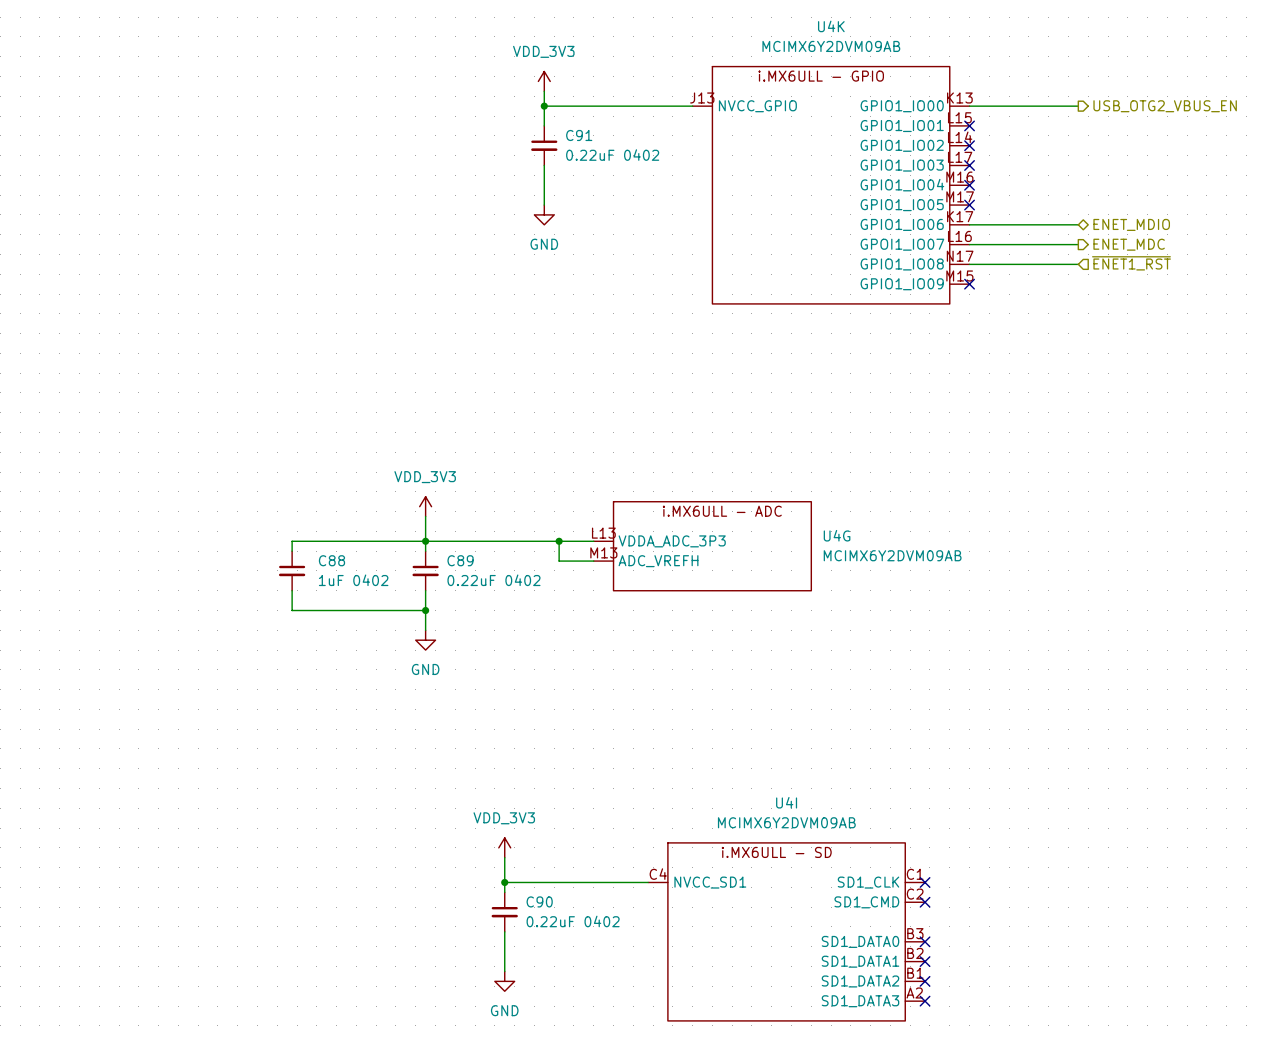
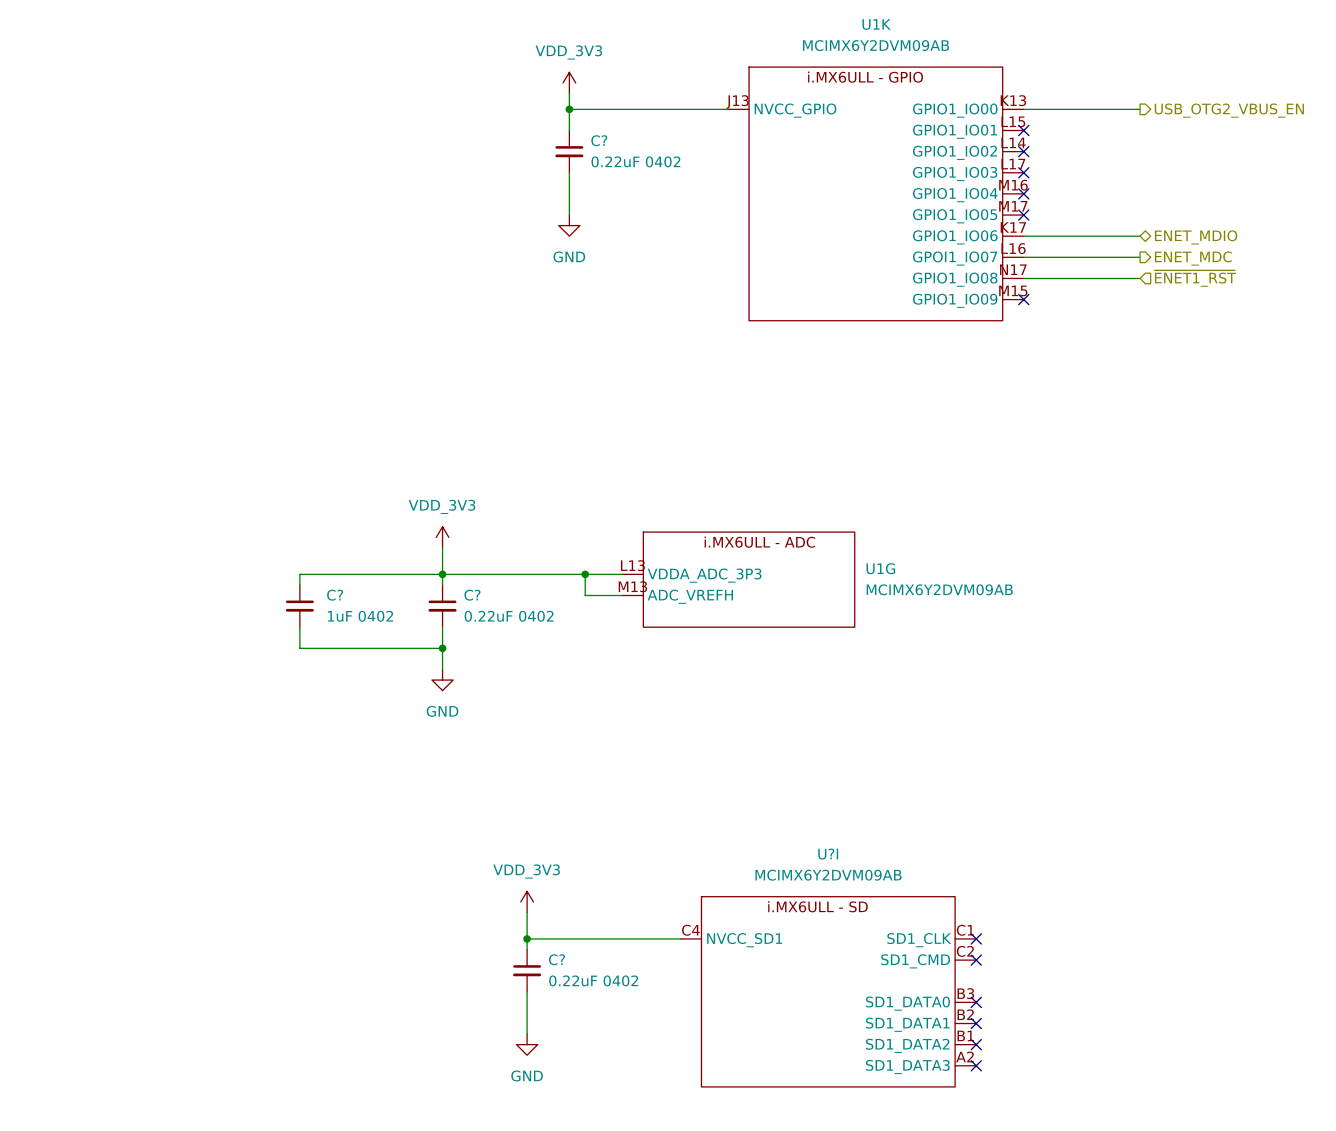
U4K name: U4K (831, 26) -> U1K (876, 24)
C91 name: C91 (579, 135) -> C? (599, 140)
U4G name: U4G (837, 535) -> U1G (880, 568)
C88 name: C88 (331, 560) -> C? (335, 595)
C89 name: C89 (460, 560) -> C? (472, 595)
U4I name: U4I (786, 802) -> U?I (828, 854)
C90 name: C90 (539, 901) -> C? (557, 959)

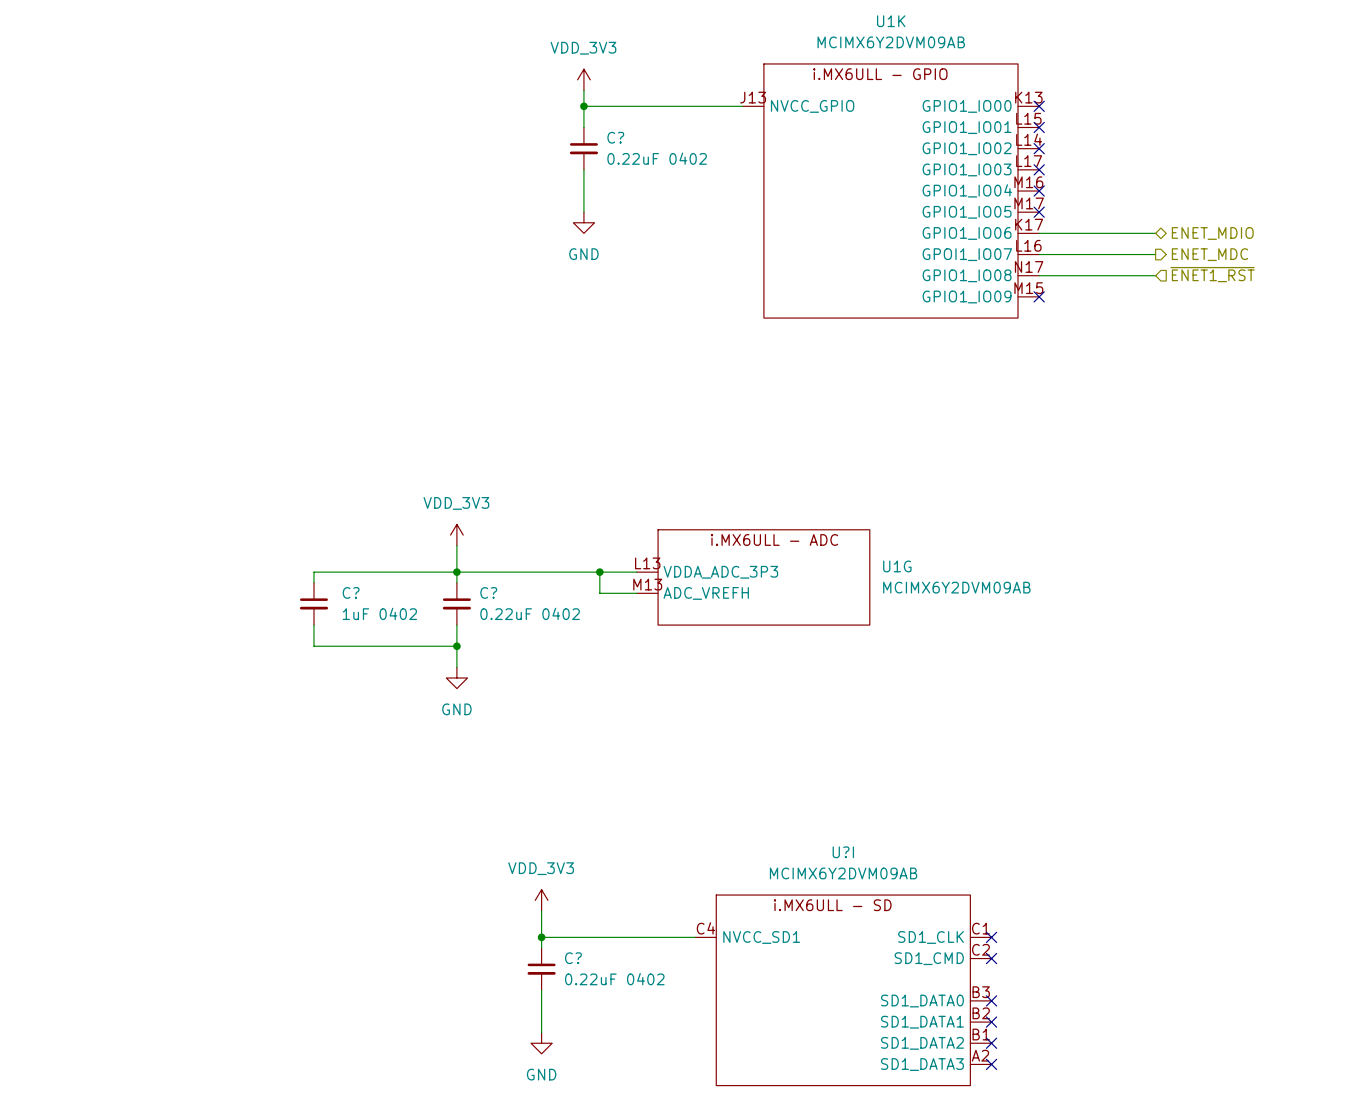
wire: (1023, 109) (1140, 109) -> none
no-connect mark: none -> (1039, 106)
hierarchical label: USB_OTG2_VBUS_EN (1229, 110) -> none

